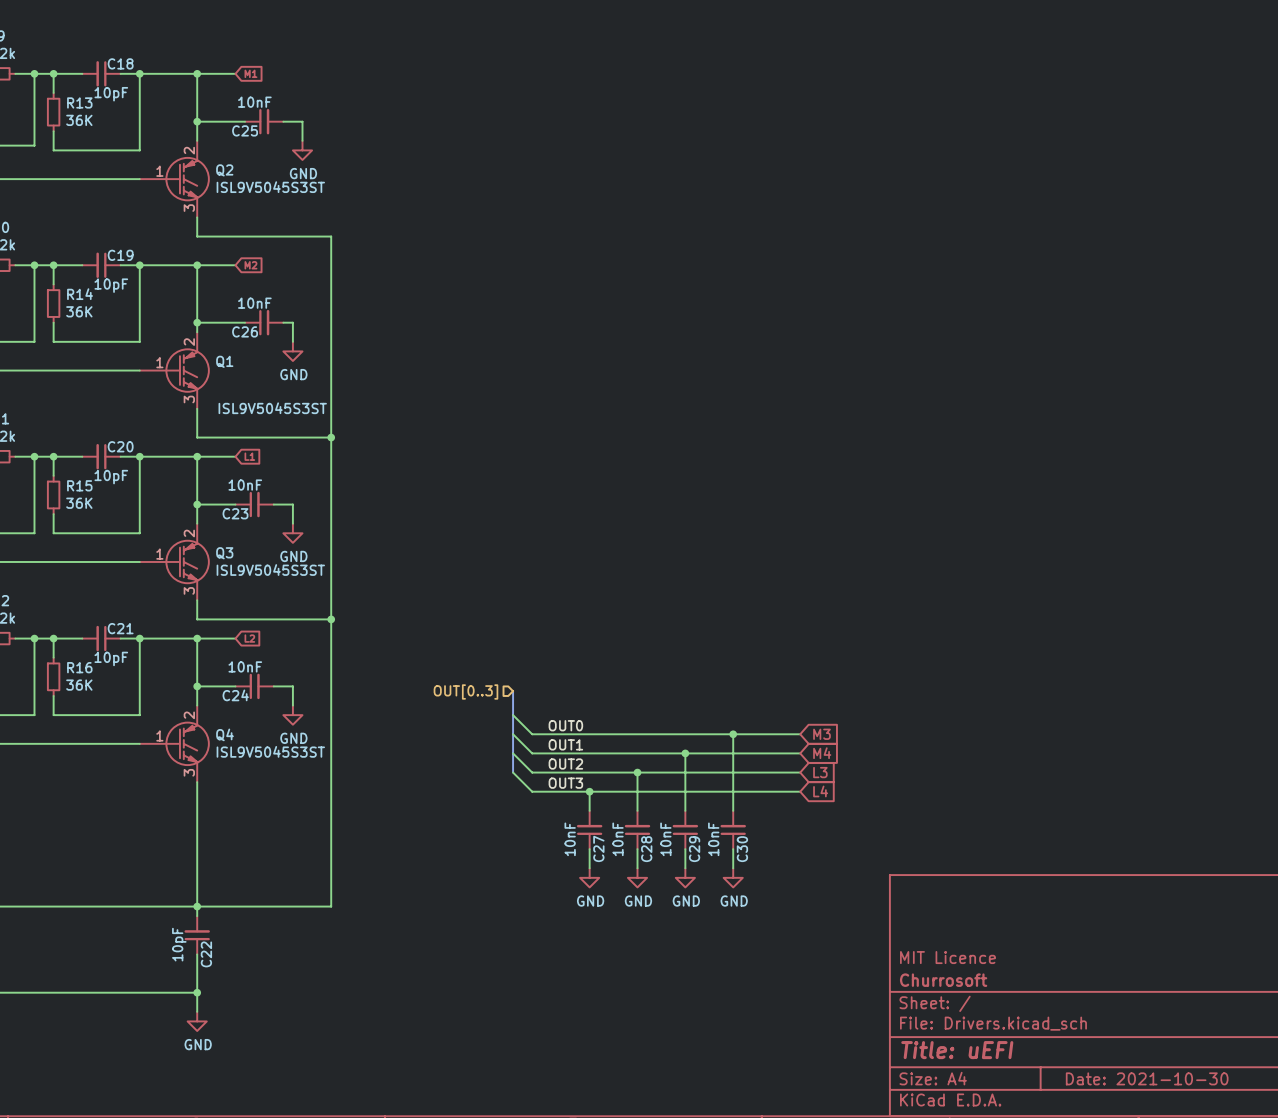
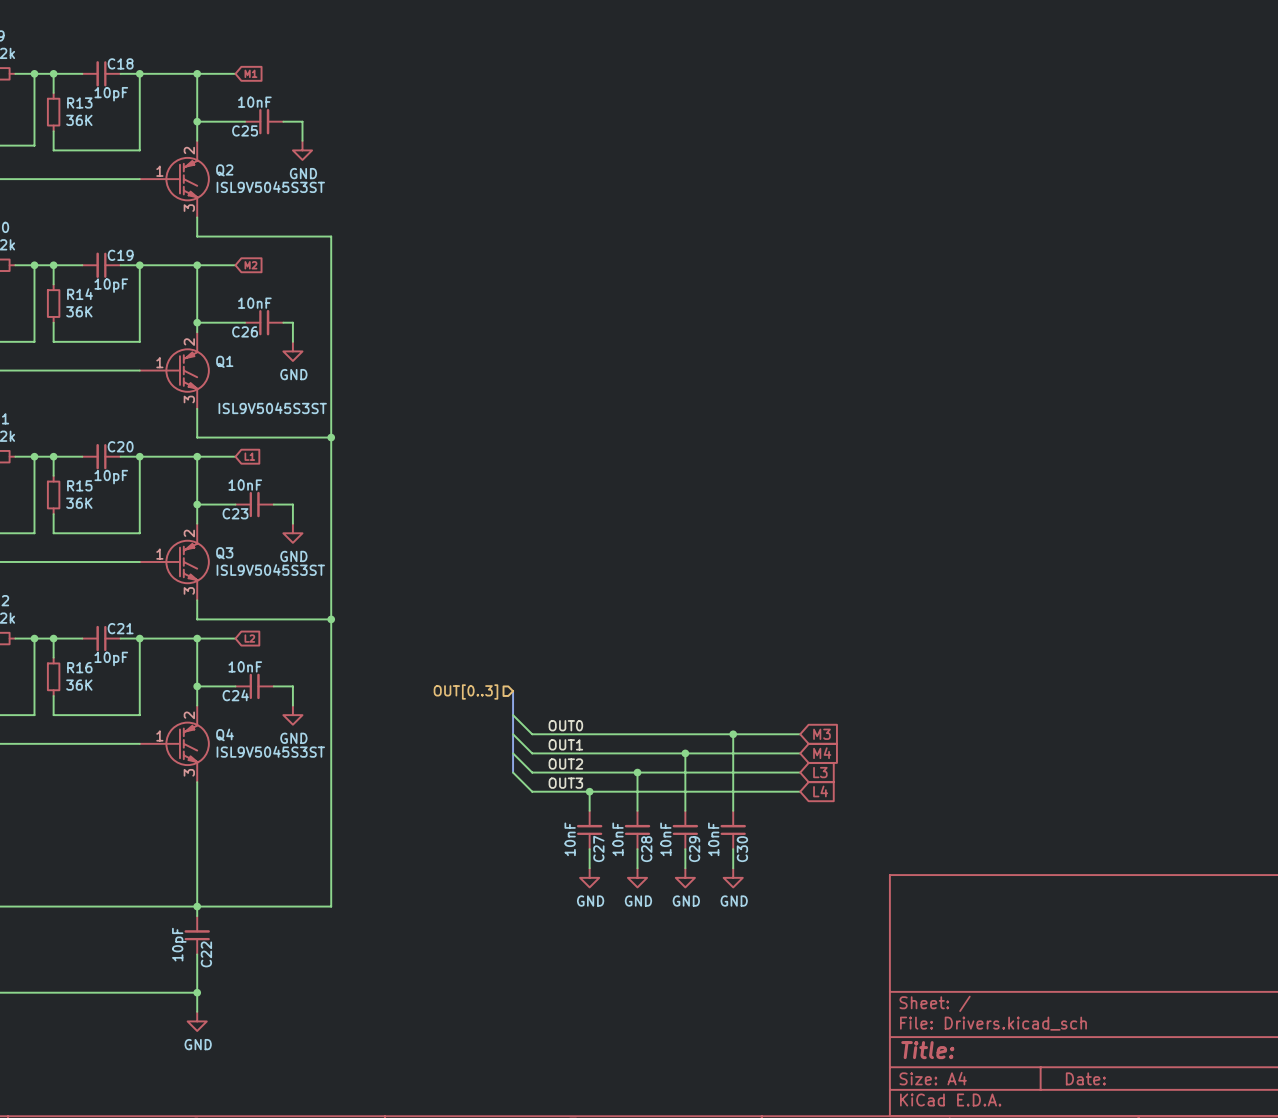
title block: MIT Licence (947, 957) -> none
title block: Churrosoft (943, 980) -> none
title block: Title: uEFI (957, 1050) -> Title: (927, 1050)
title block: Date: 2021-10-30 (1147, 1078) -> Date: (1085, 1078)

